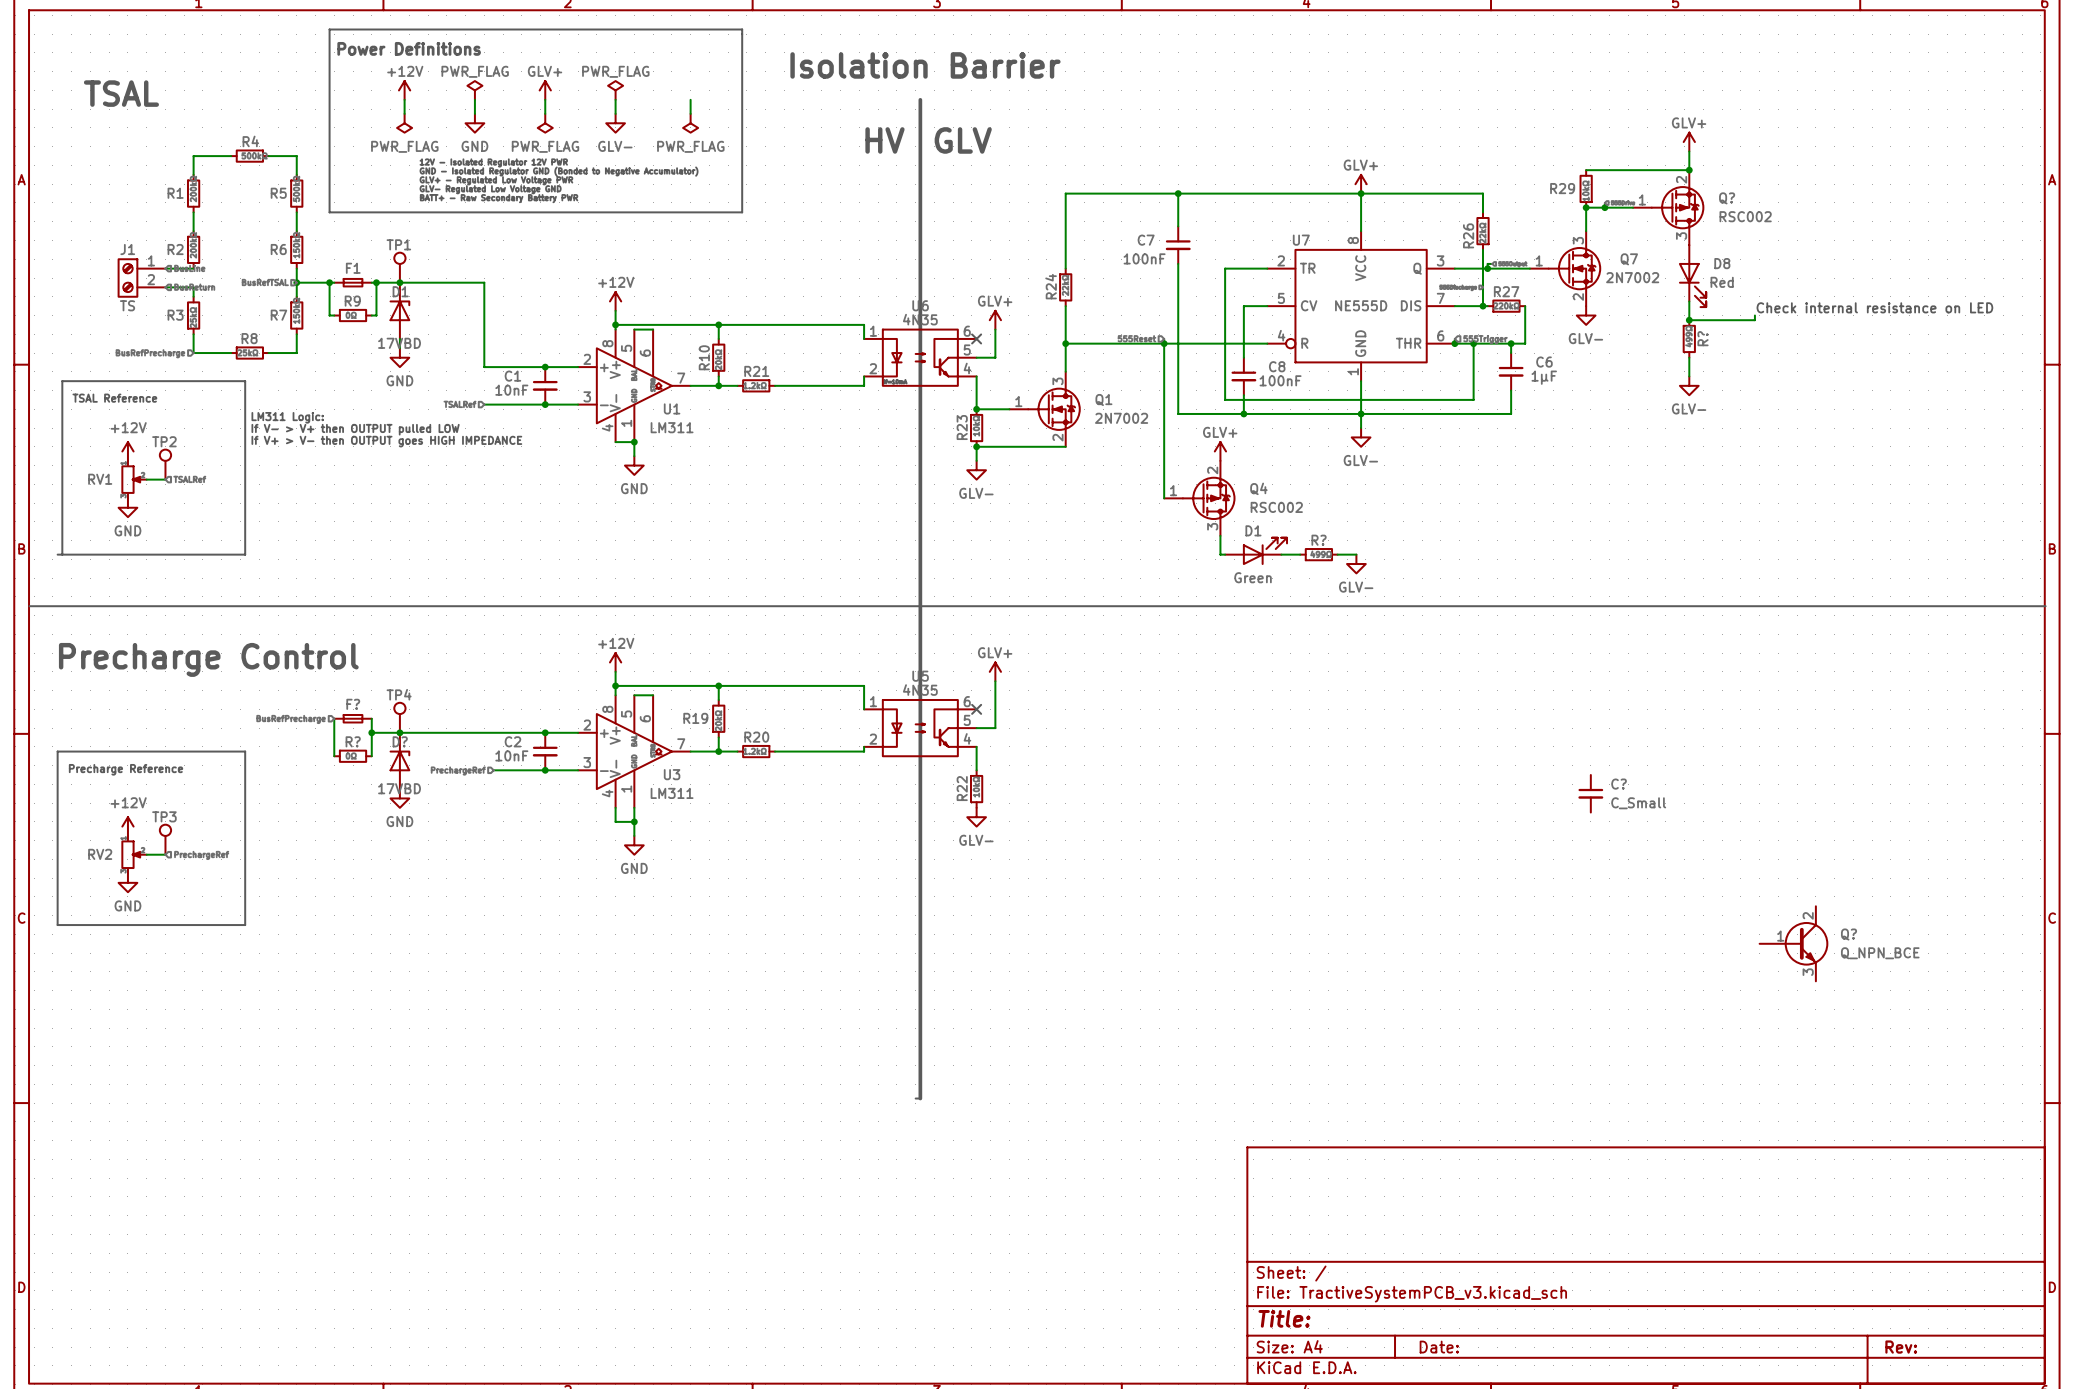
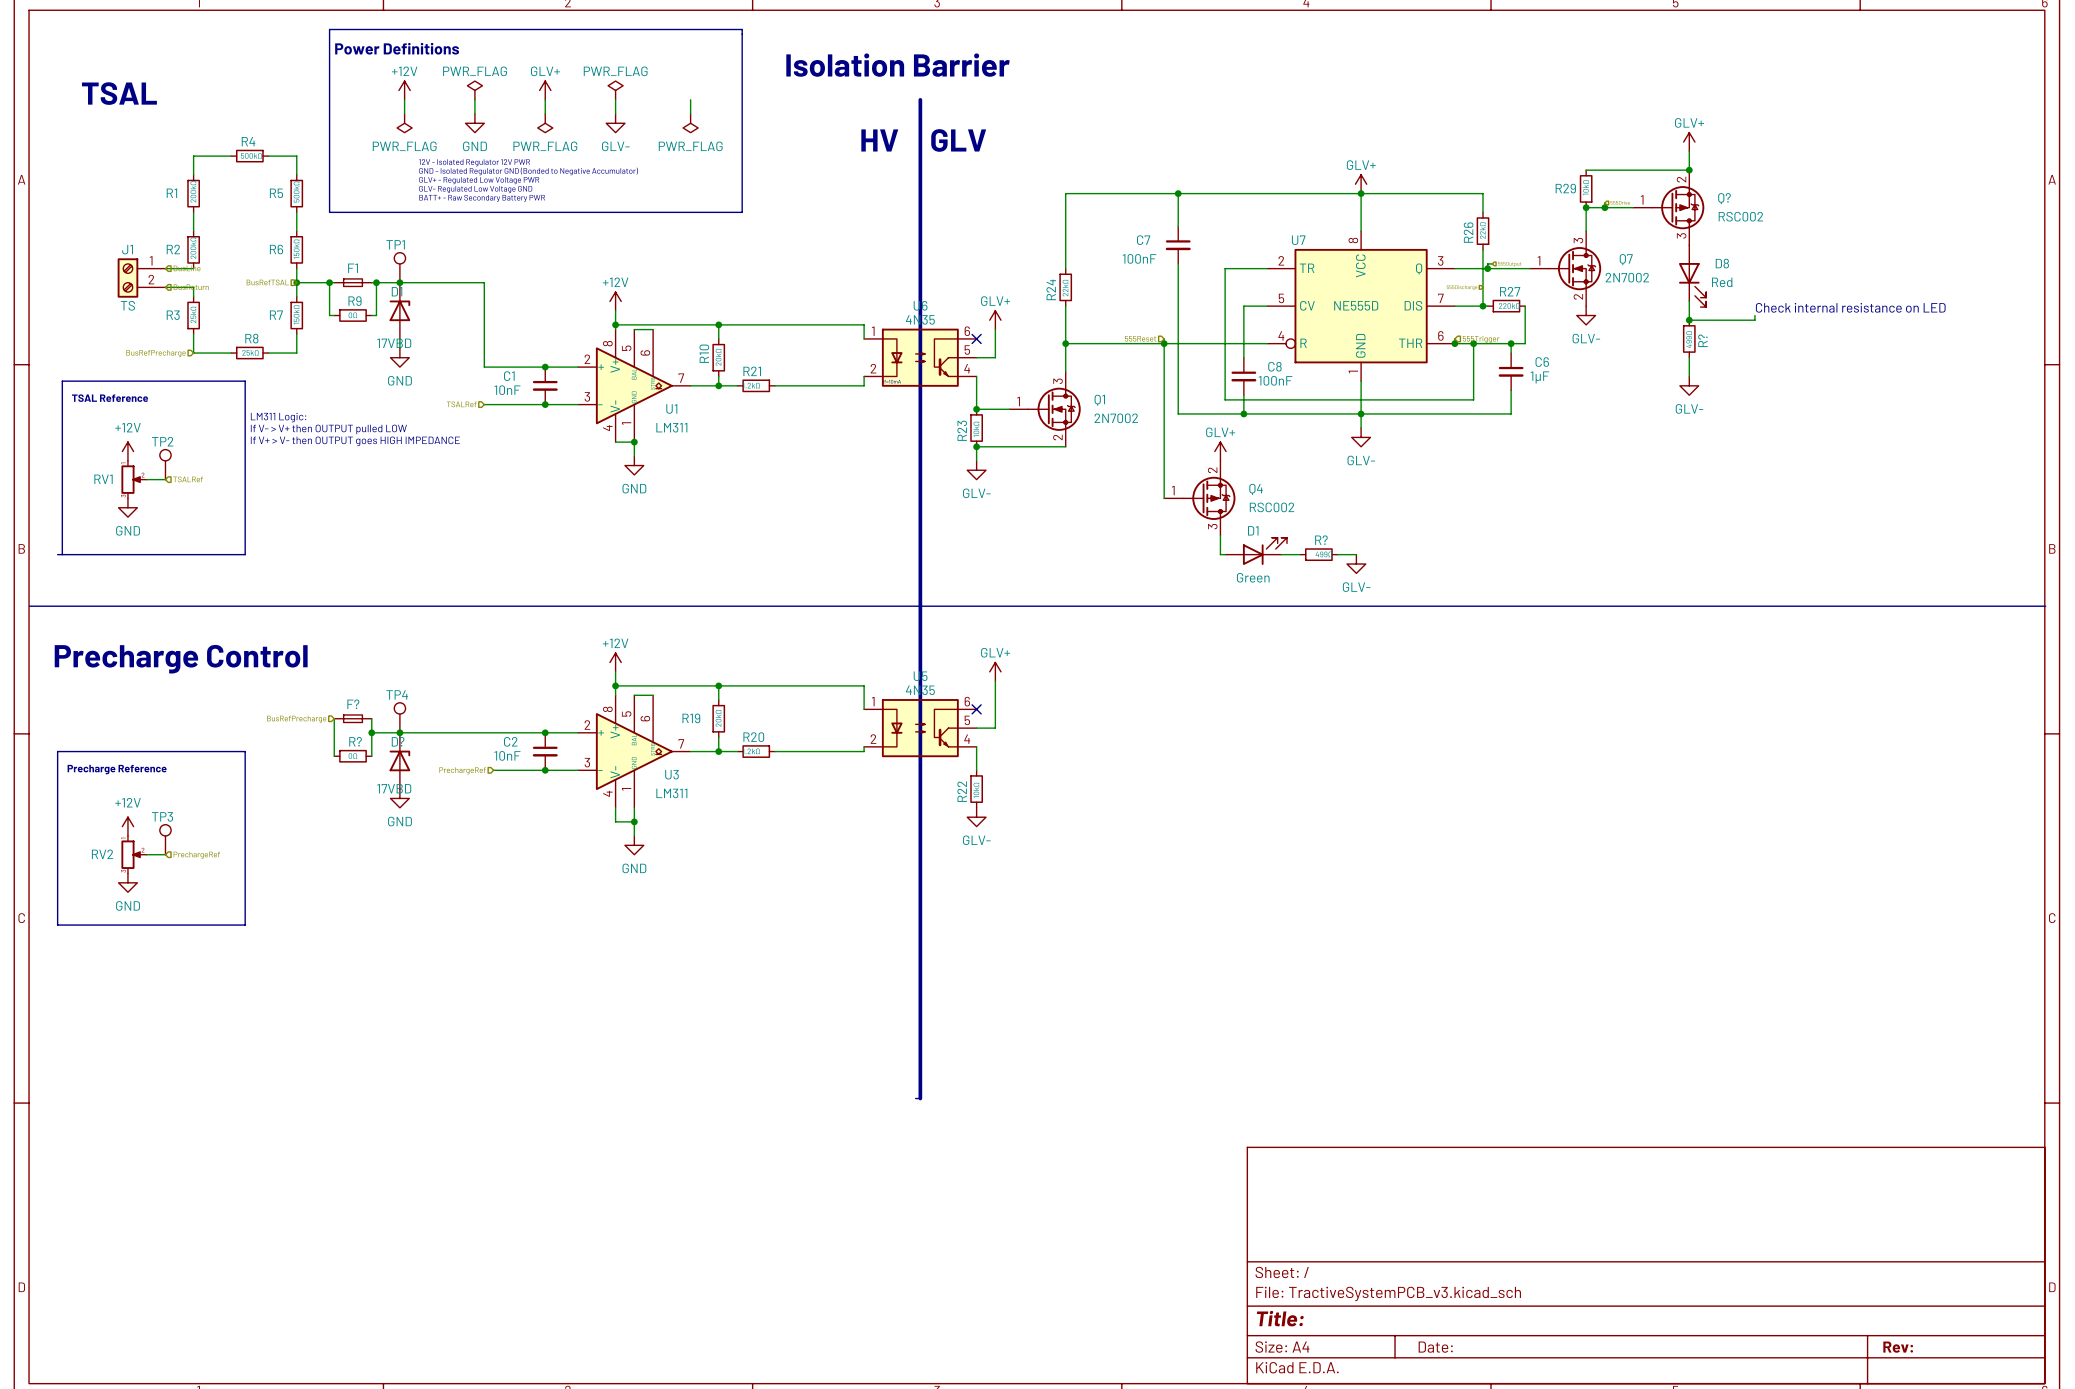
C?: C_Small (1590, 793) -> none
Q?: Q_NPN_BCE (1793, 943) -> none

